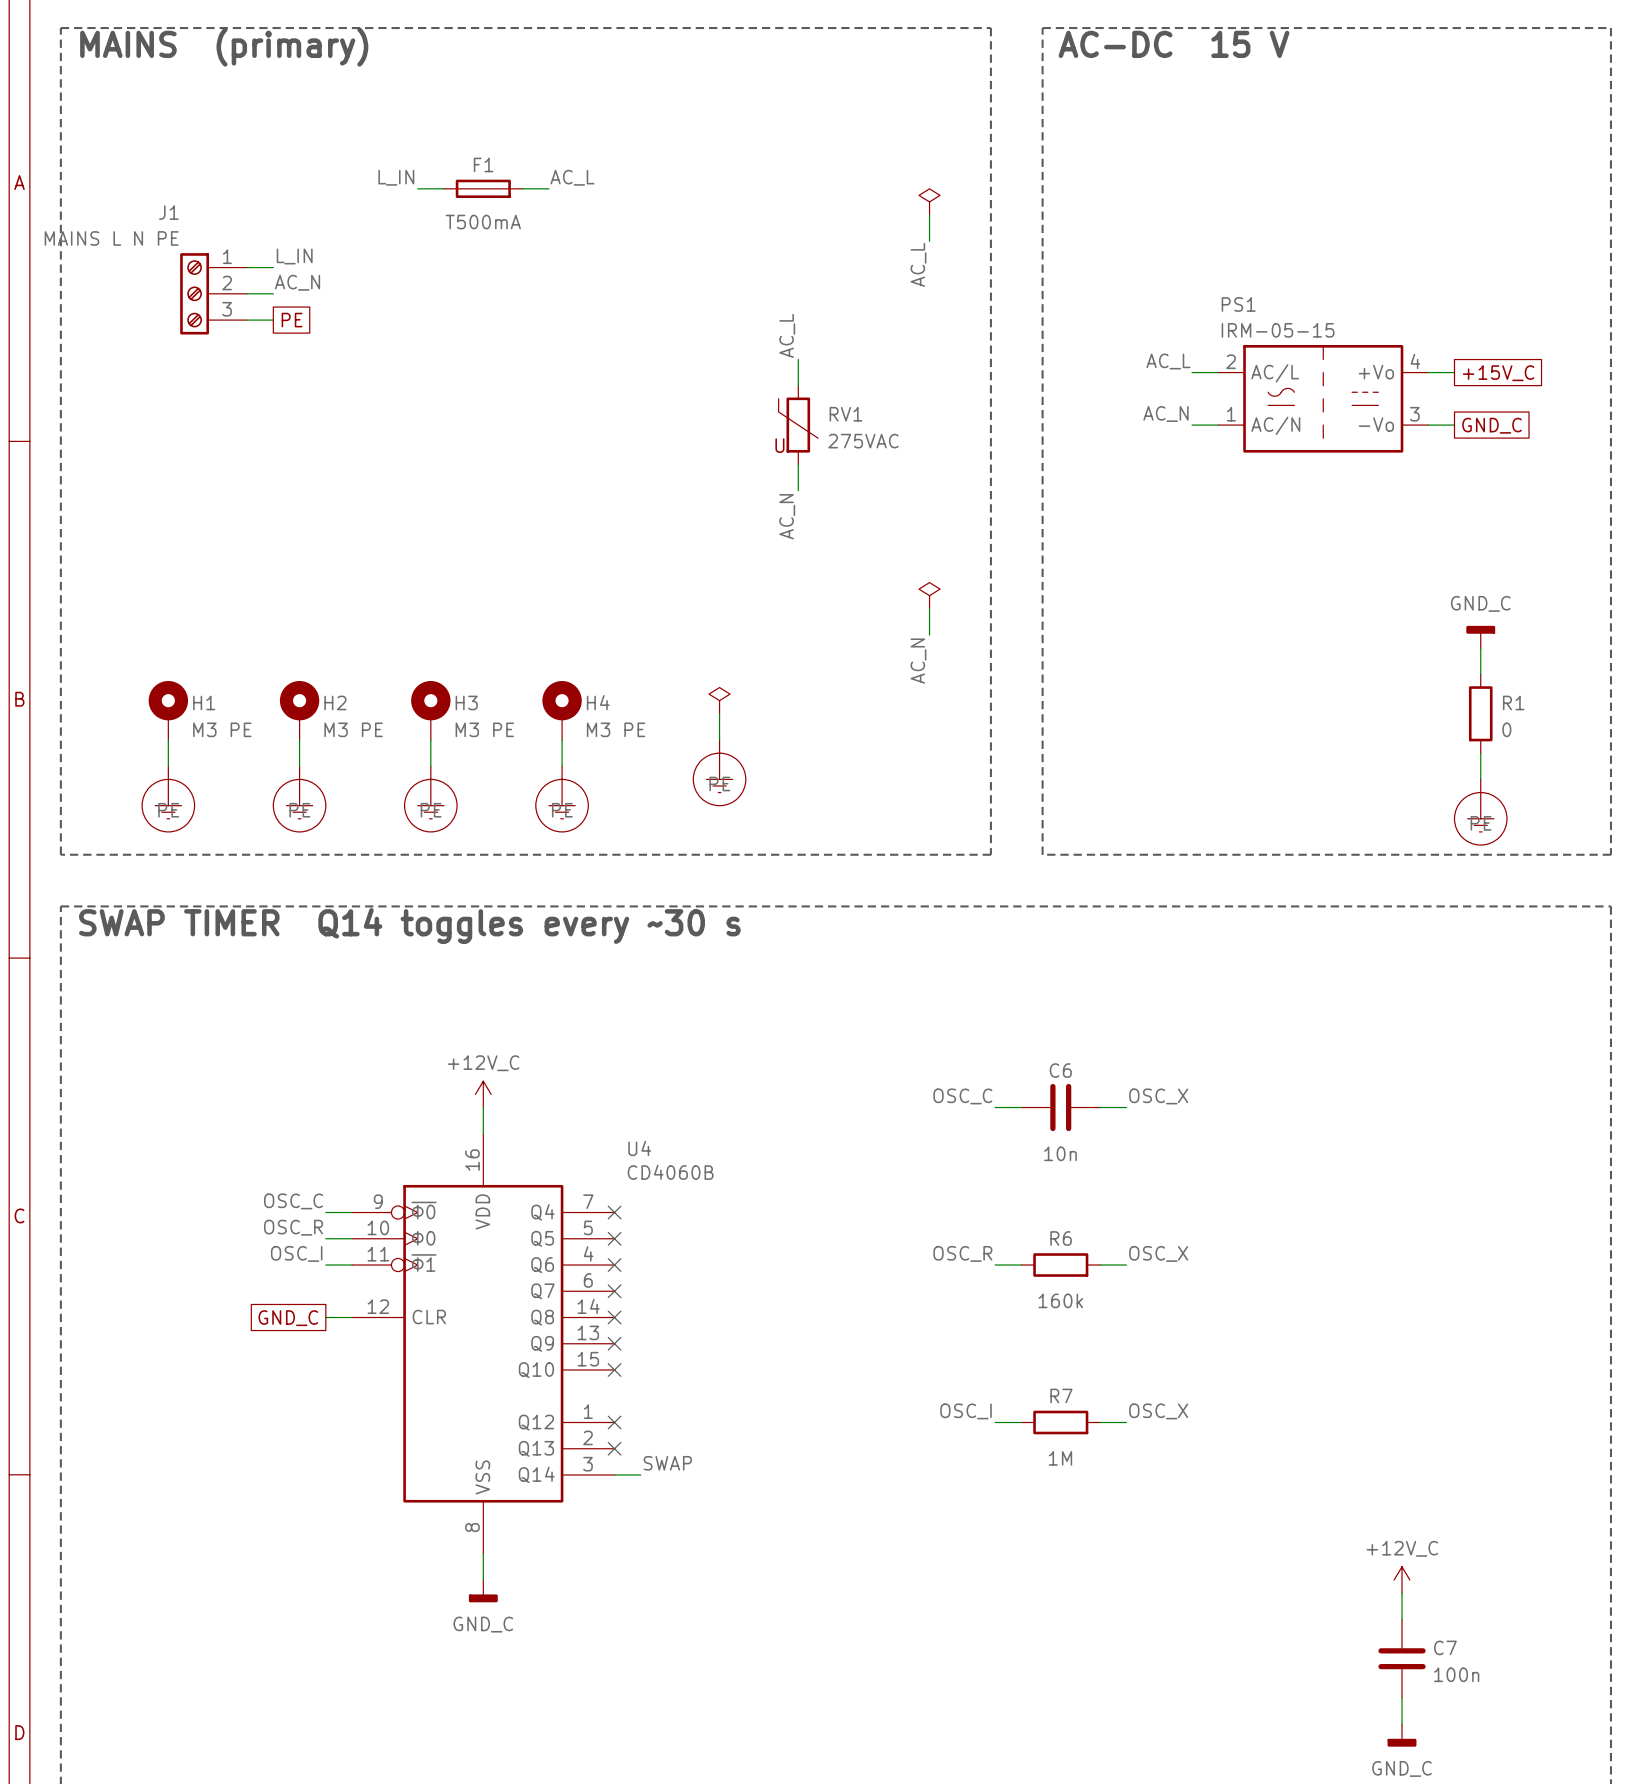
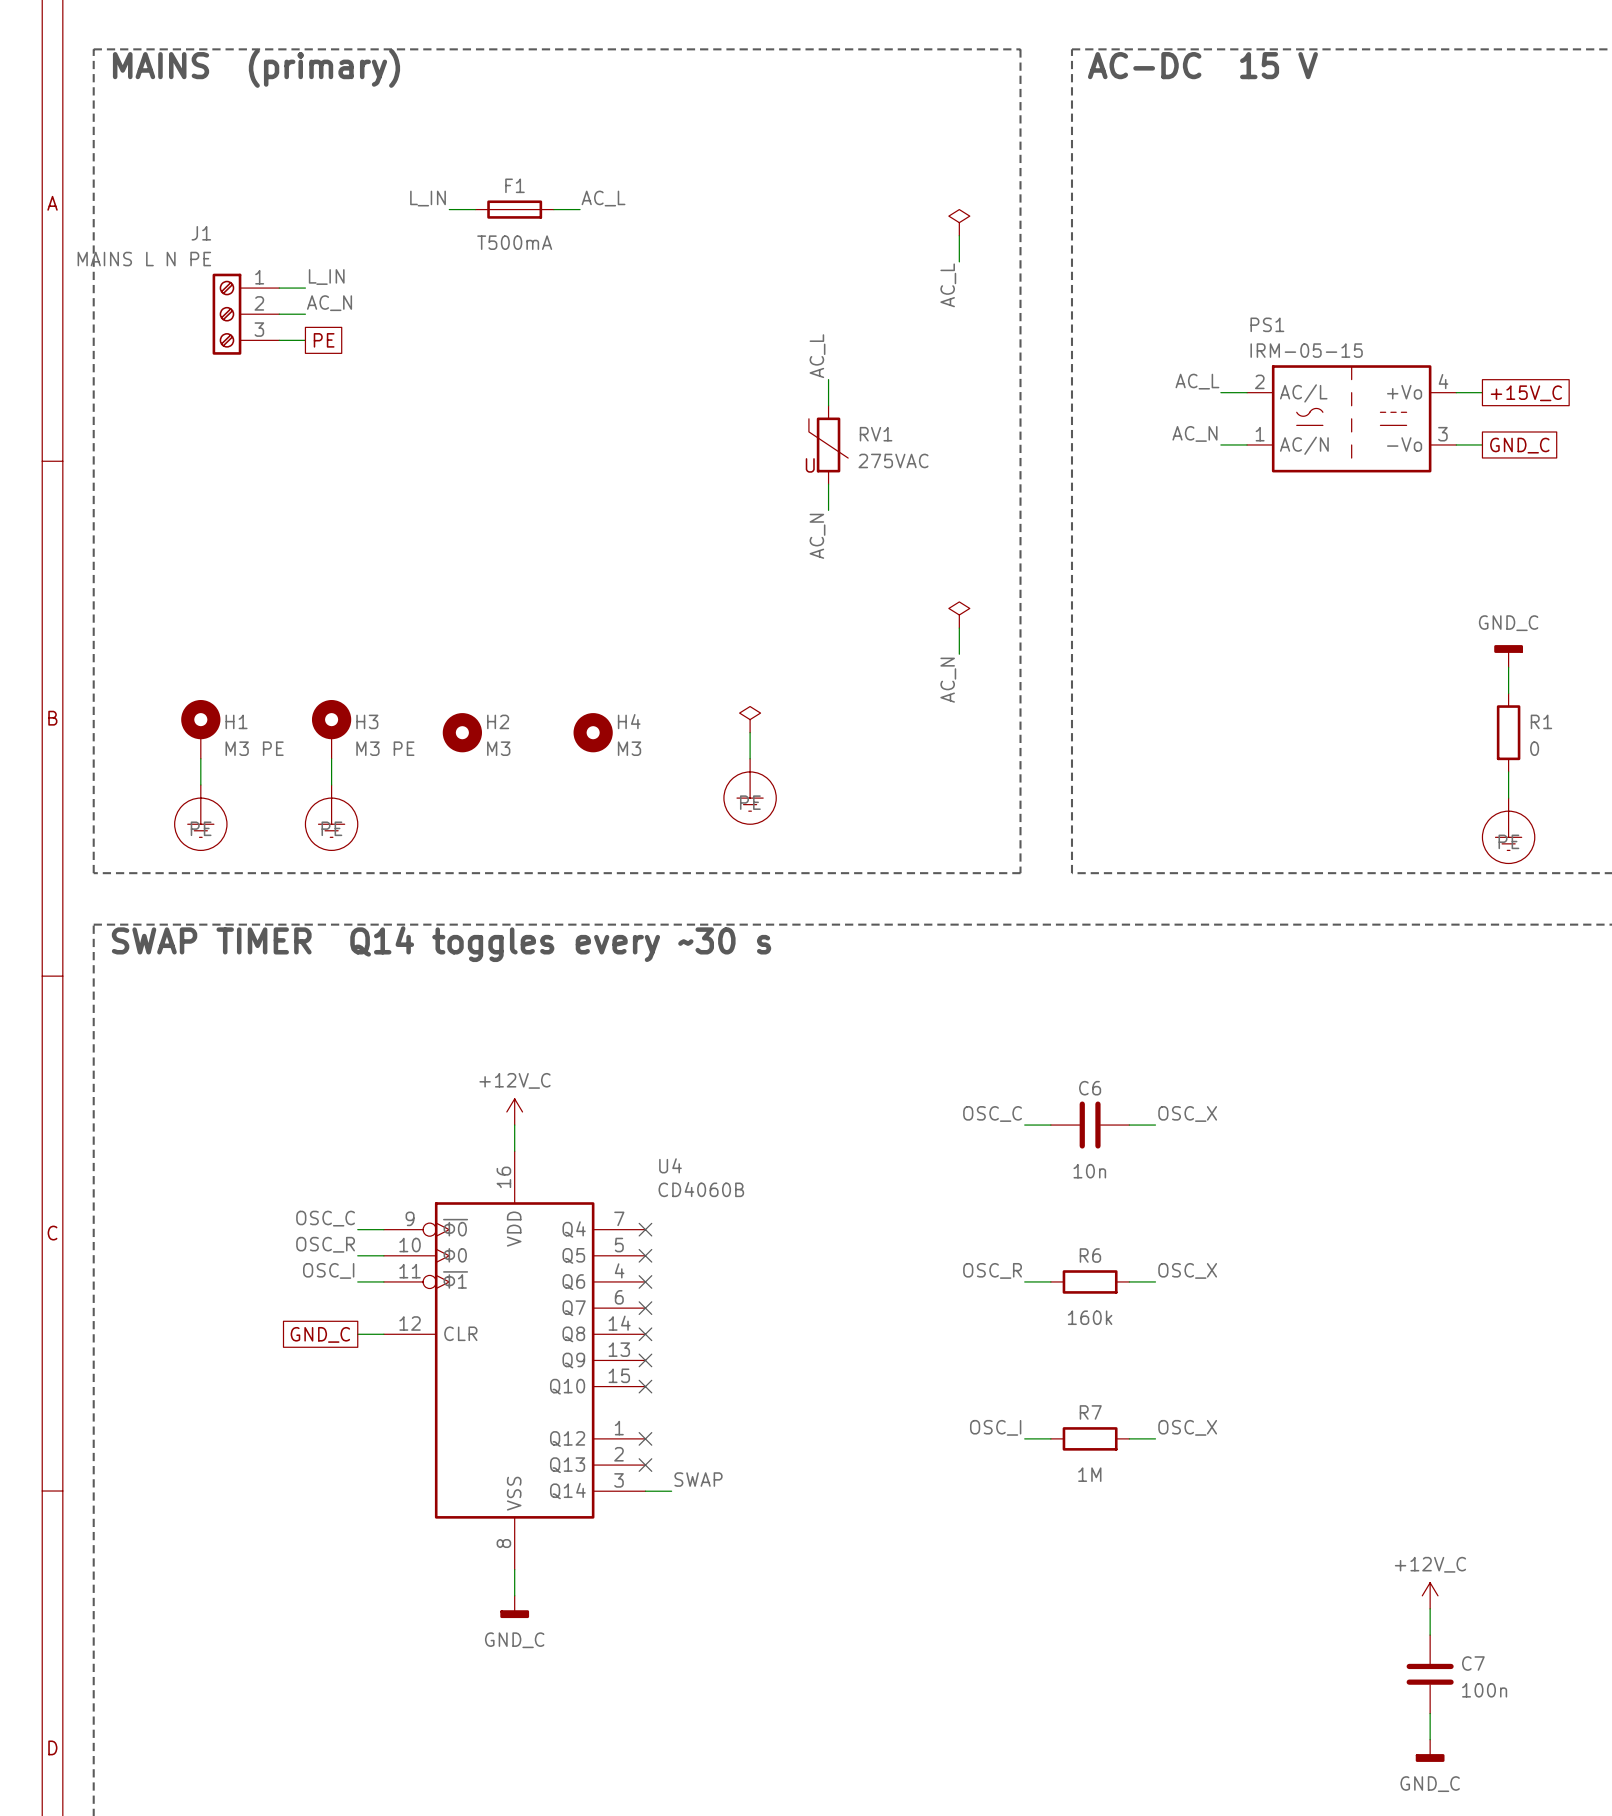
H4 symbol: [542, 680, 582, 741] -> [573, 713, 613, 753]
H2 name: H2 (335, 702) -> H3 (367, 721)
H3: M3 PE (430, 710) -> none
H2: none -> M3 (462, 732)
H4 value: M3 PE (616, 729) -> M3 (629, 748)
wire: (430, 740) (430, 766) -> none
wire: (562, 740) (562, 766) -> none
power symbol: PE (430, 799) -> none
power symbol: PE (562, 799) -> none

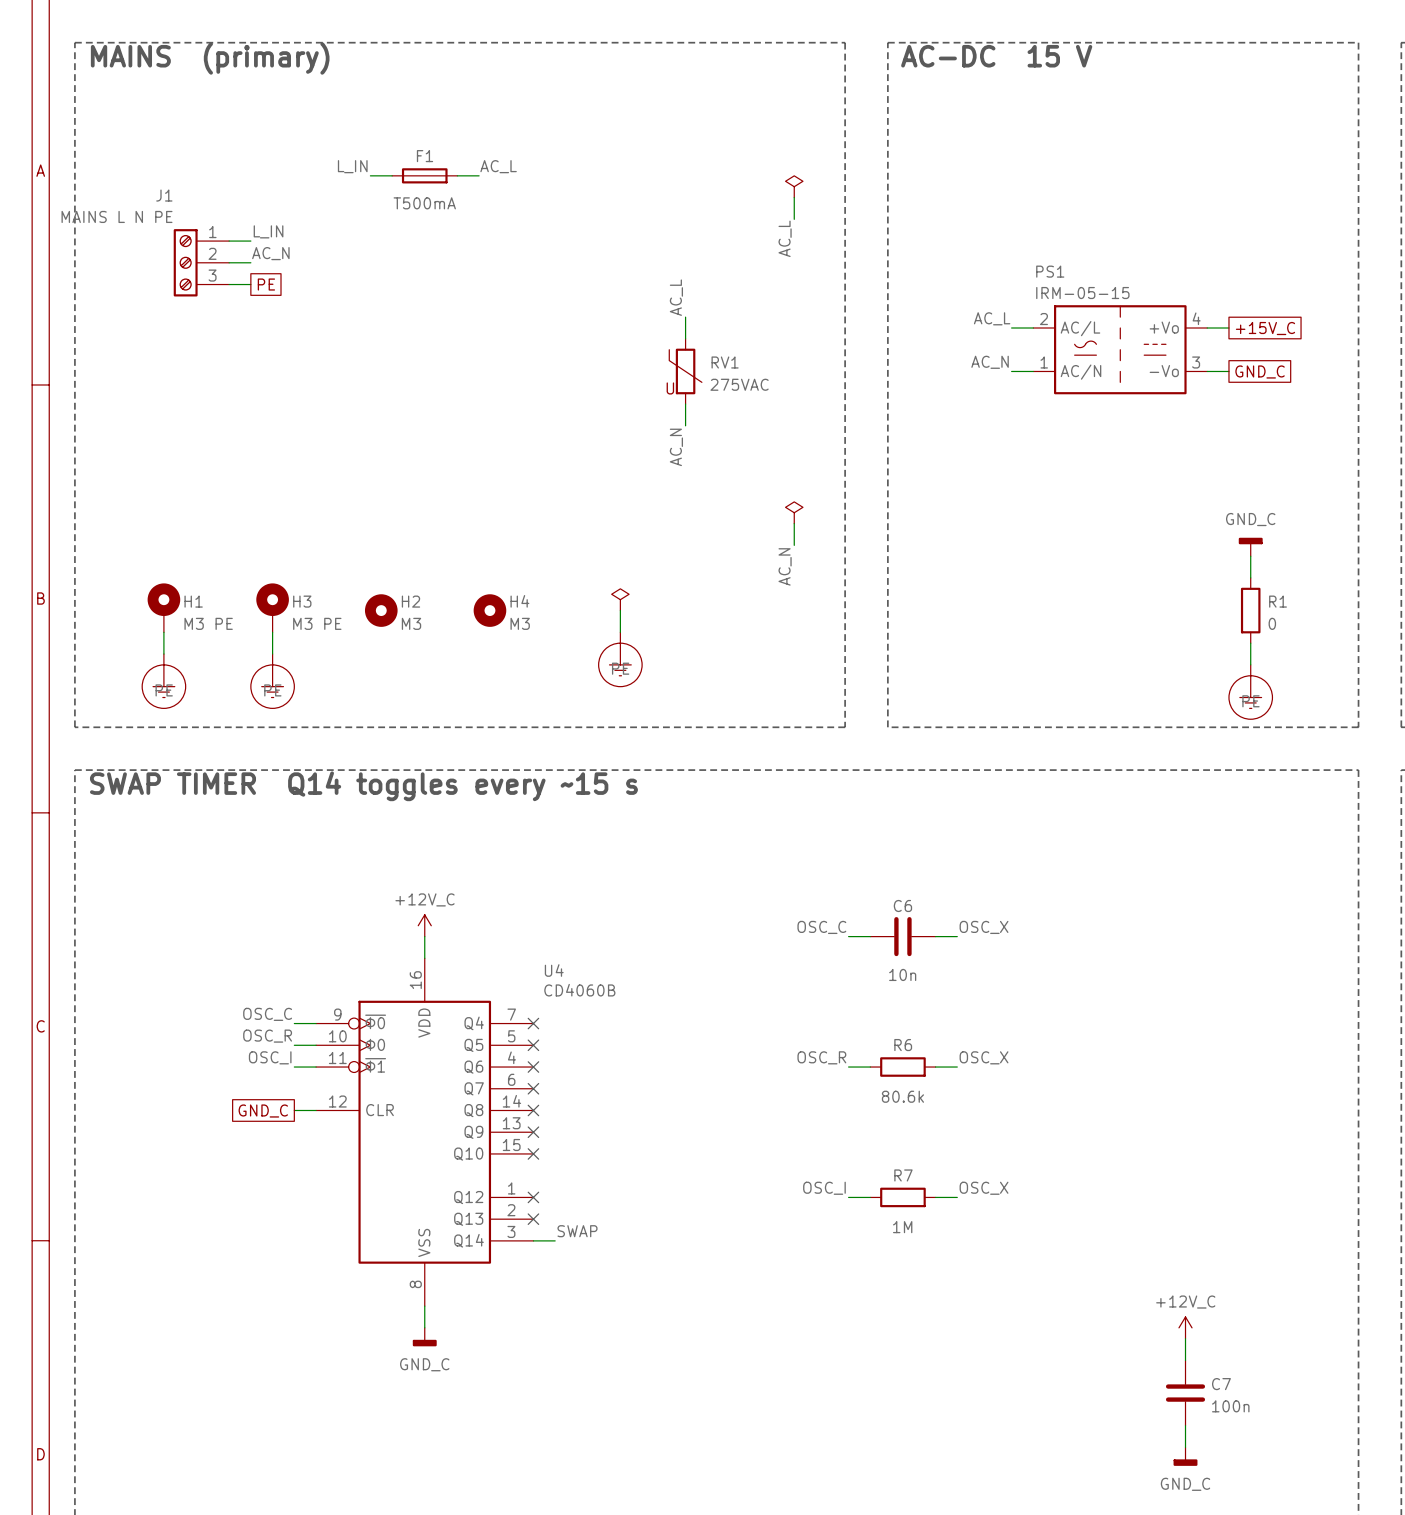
text: SWAP TIMER Q14 toggles every ~30 s (441, 944) -> SWAP TIMER Q14 toggles every ~15 s (363, 786)
R6 value: 160k (1090, 1317) -> 80.6k (902, 1096)

